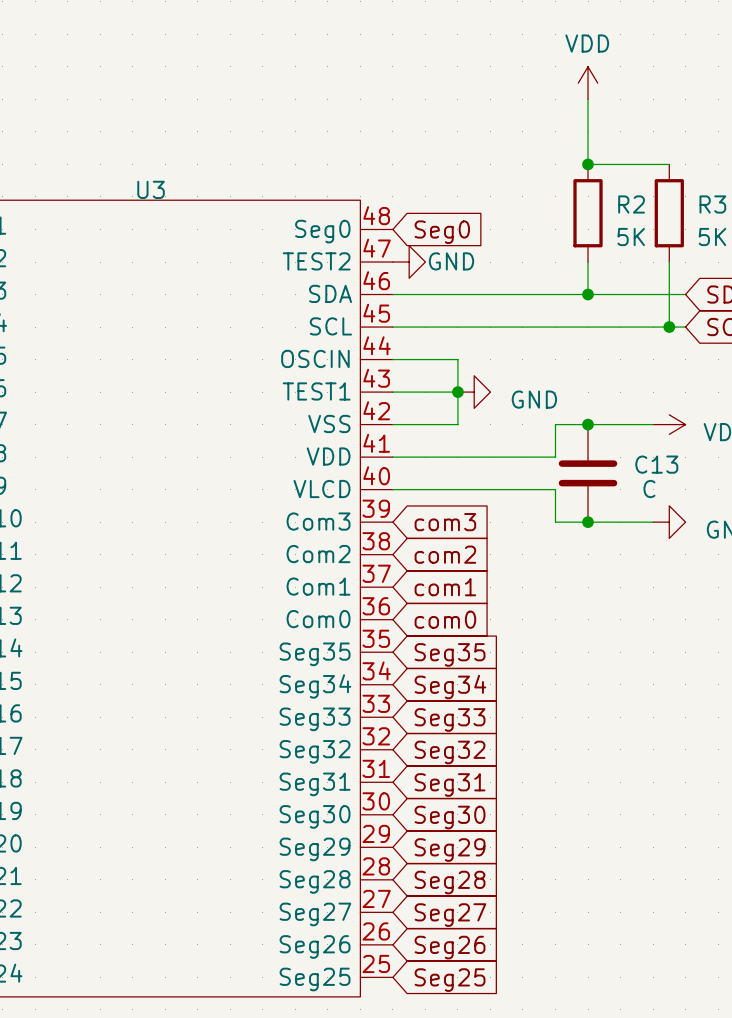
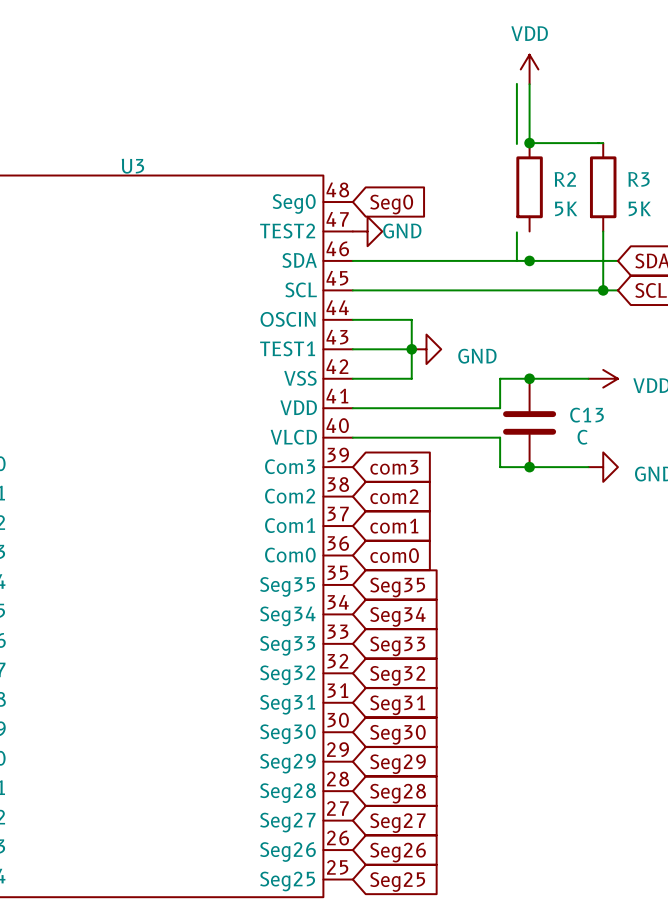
wire: none -> (516, 83) (516, 143)
wire: none -> (516, 232) (516, 260)
wire: (588, 262) (588, 294) -> none

